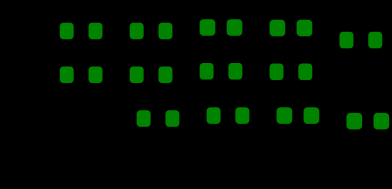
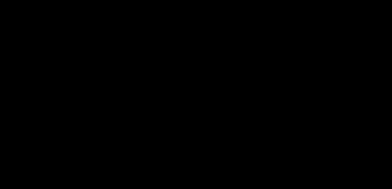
part: (220, 27) -> none
part: (290, 28) -> none
part: (81, 30) -> none
part: (151, 30) -> none
part: (360, 40) -> none
part: (220, 71) -> none
part: (290, 71) -> none
part: (81, 74) -> none
part: (151, 74) -> none
part: (227, 115) -> none
part: (297, 115) -> none
part: (158, 118) -> none
part: (367, 121) -> none

